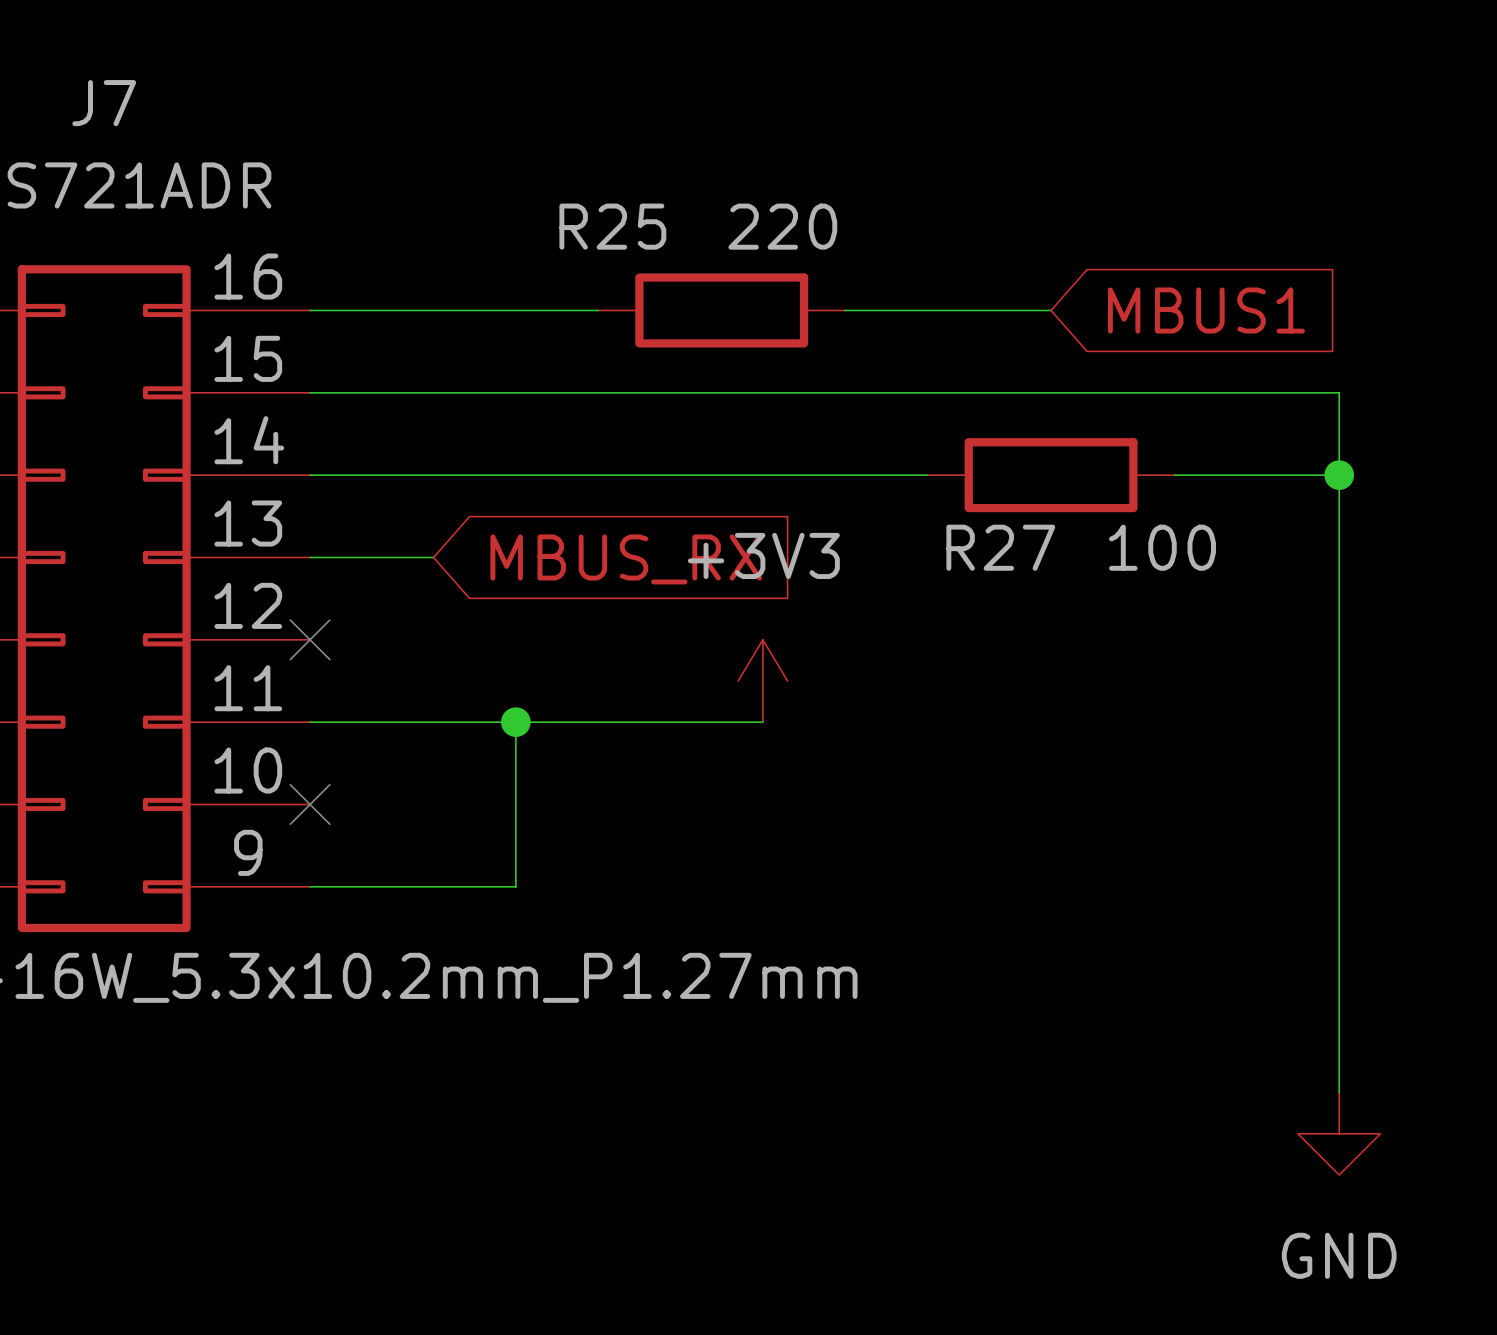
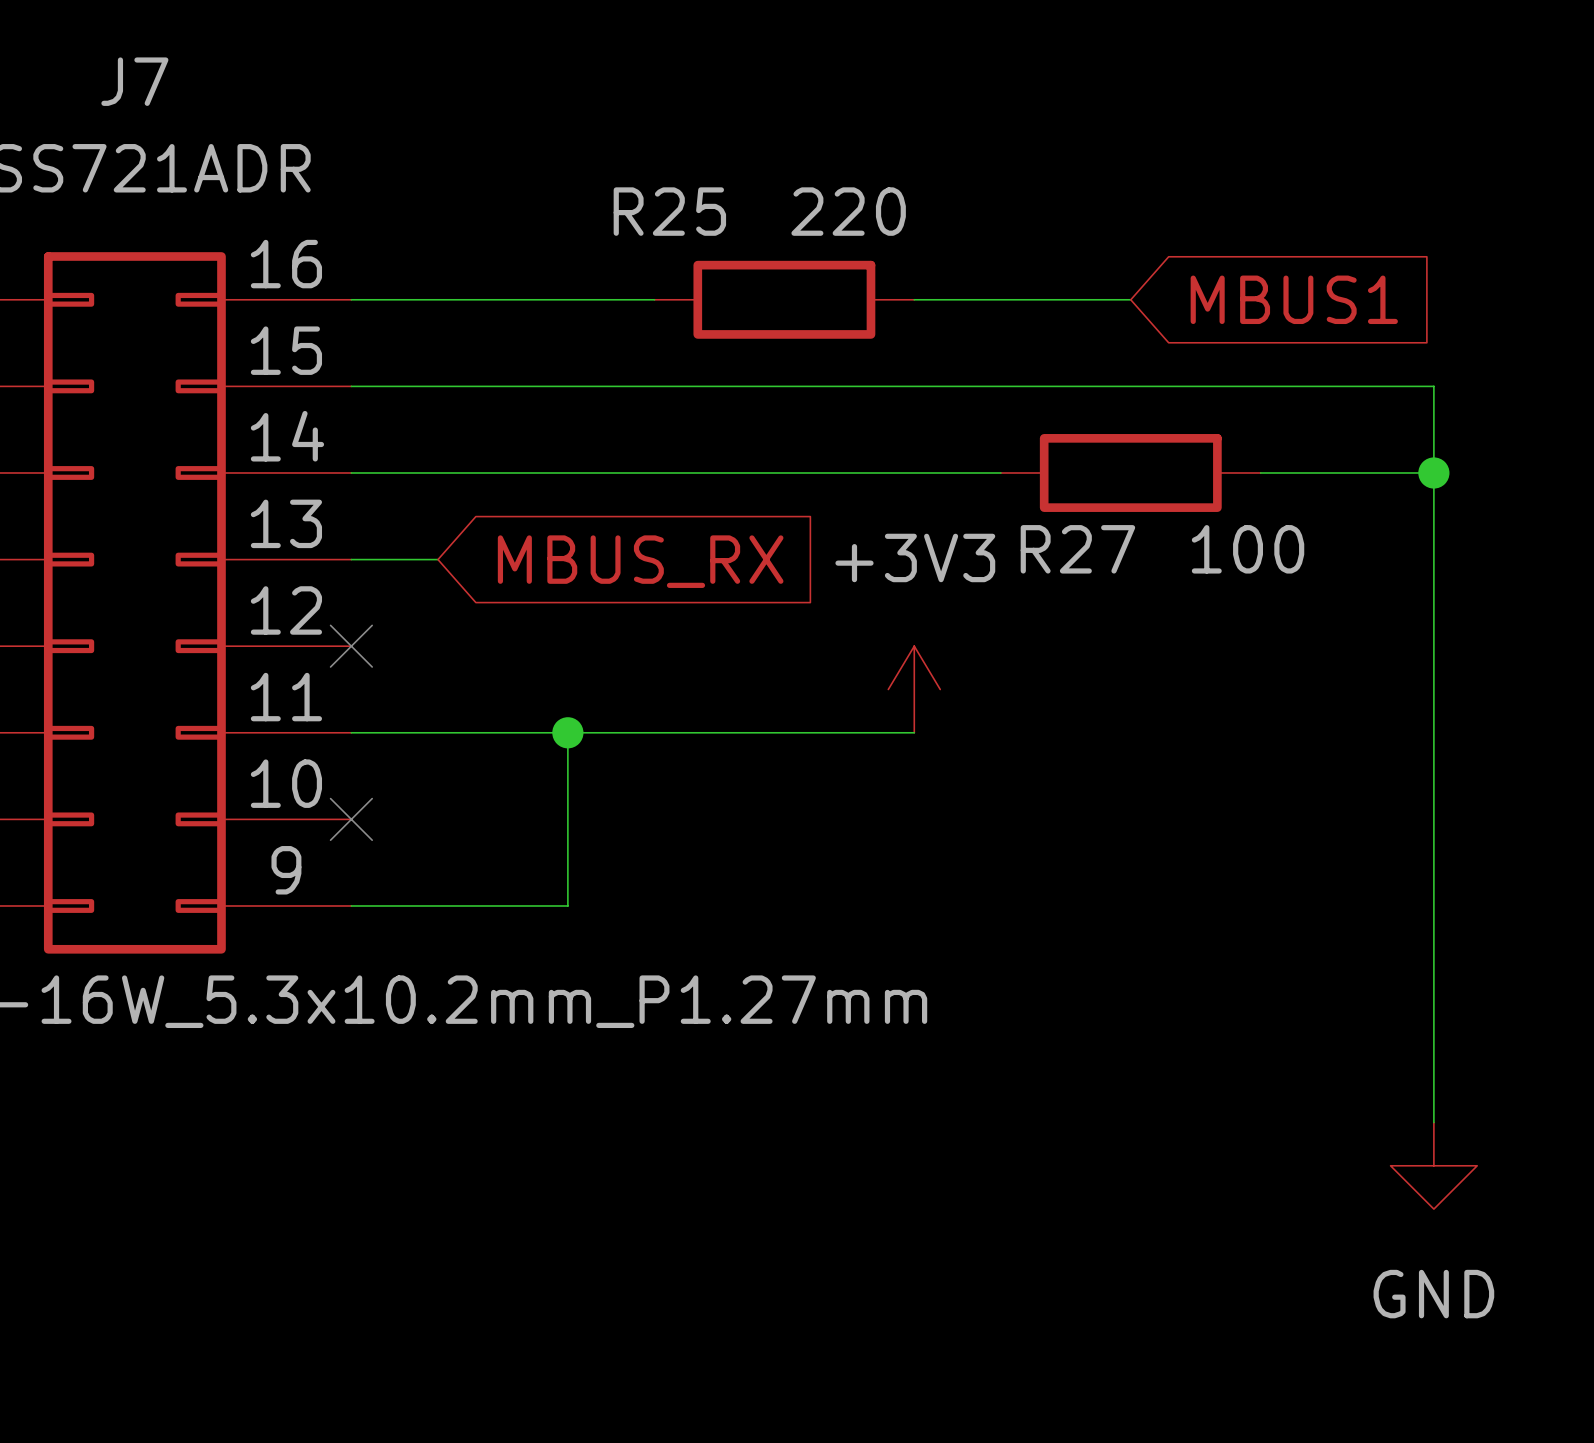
wire: (392, 557) (433, 557) -> none
global label position: MBUS_RX (626, 559) -> MBUS_RX (640, 561)
power symbol position: +3V3 (762, 680) -> +3V3 (914, 689)
wire: none -> (827, 732) (914, 732)

